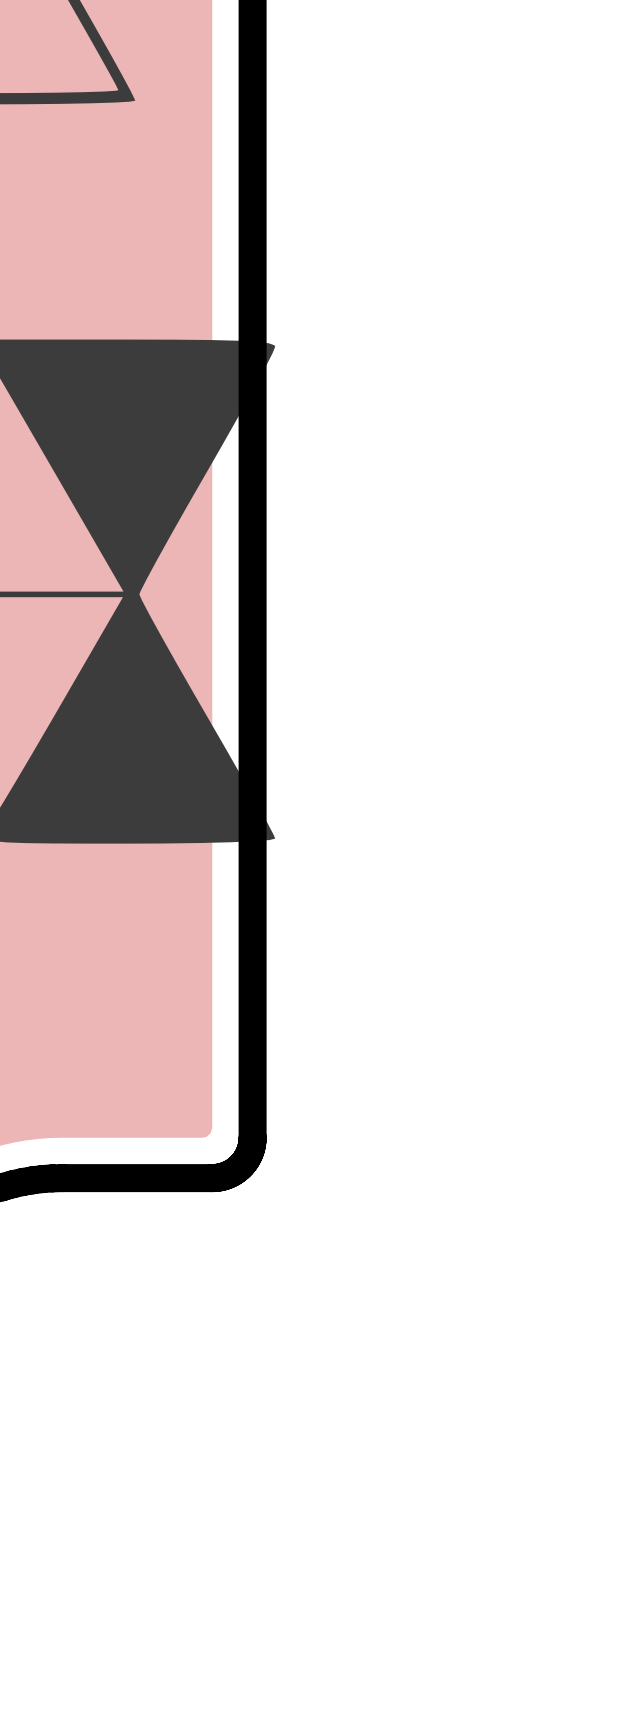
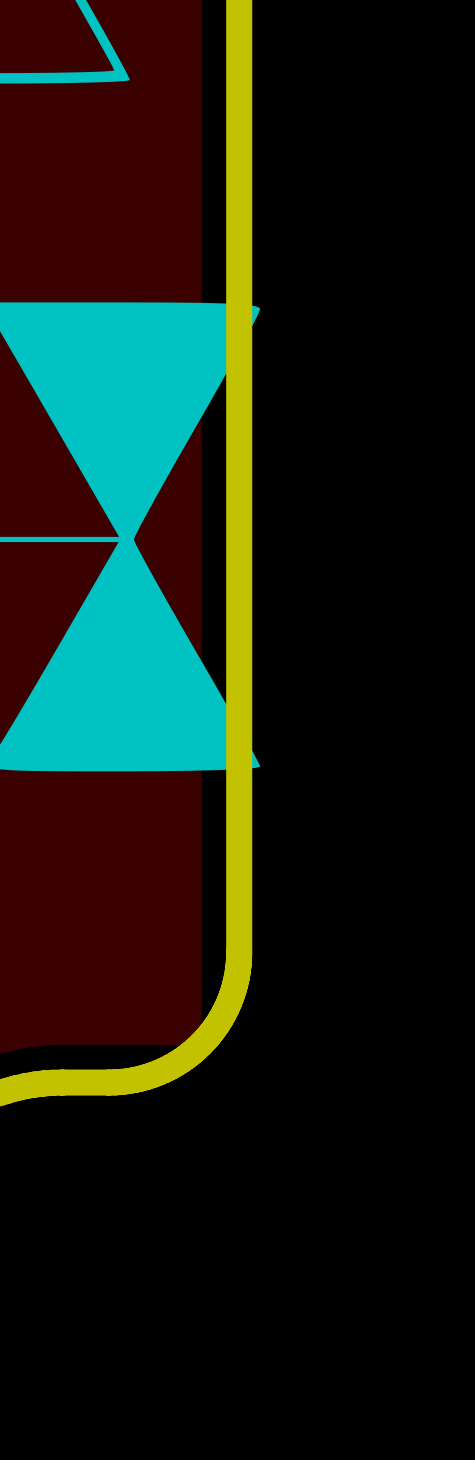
board edge: (252, 1038) (252, 1141) (248, 1154) (240, 1166) (229, 1174) (216, 1177) (112, 1178) -> (239, 952) (236, 977) (229, 1002) (217, 1024) (201, 1044) (181, 1060) (158, 1072) (134, 1080) (108, 1082)

